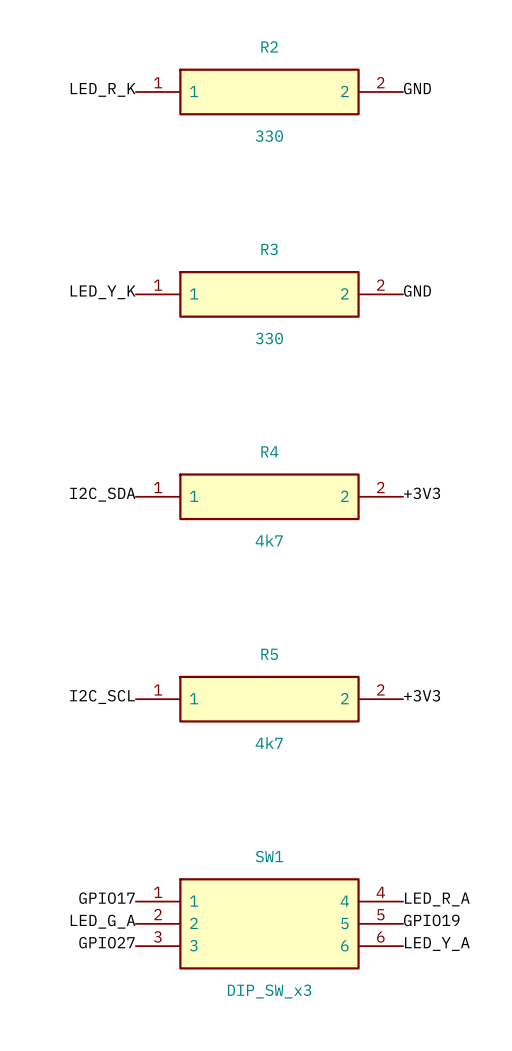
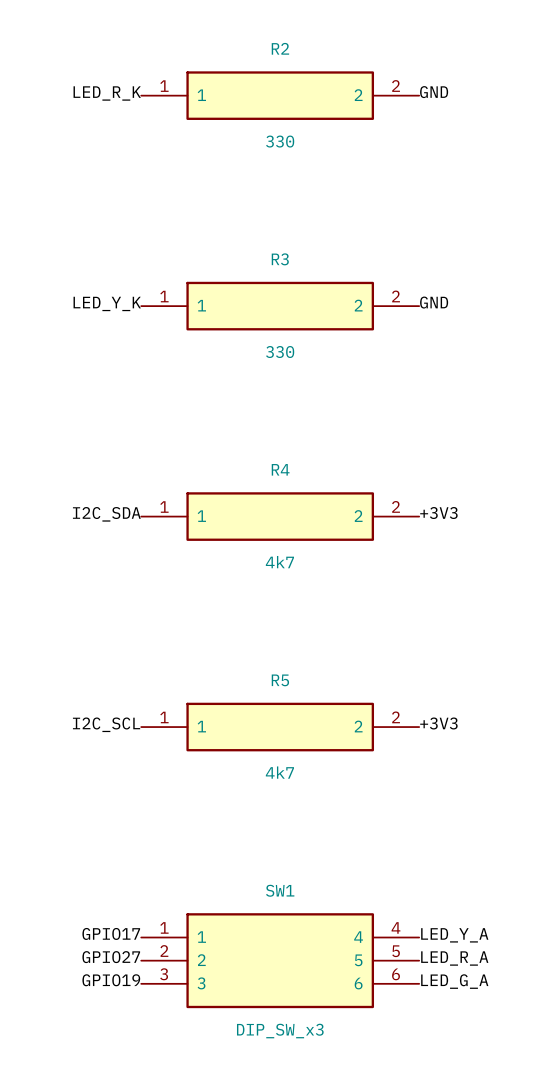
label: LED_R_A (437, 899) -> LED_Y_A (454, 935)
label: GPIO19 (431, 920) -> LED_R_A (454, 958)
label: LED_G_A (103, 921) -> GPIO27 (111, 957)
label: GPIO27 (106, 942) -> GPIO19 (111, 980)
label: LED_Y_A (437, 944) -> LED_G_A (454, 981)

